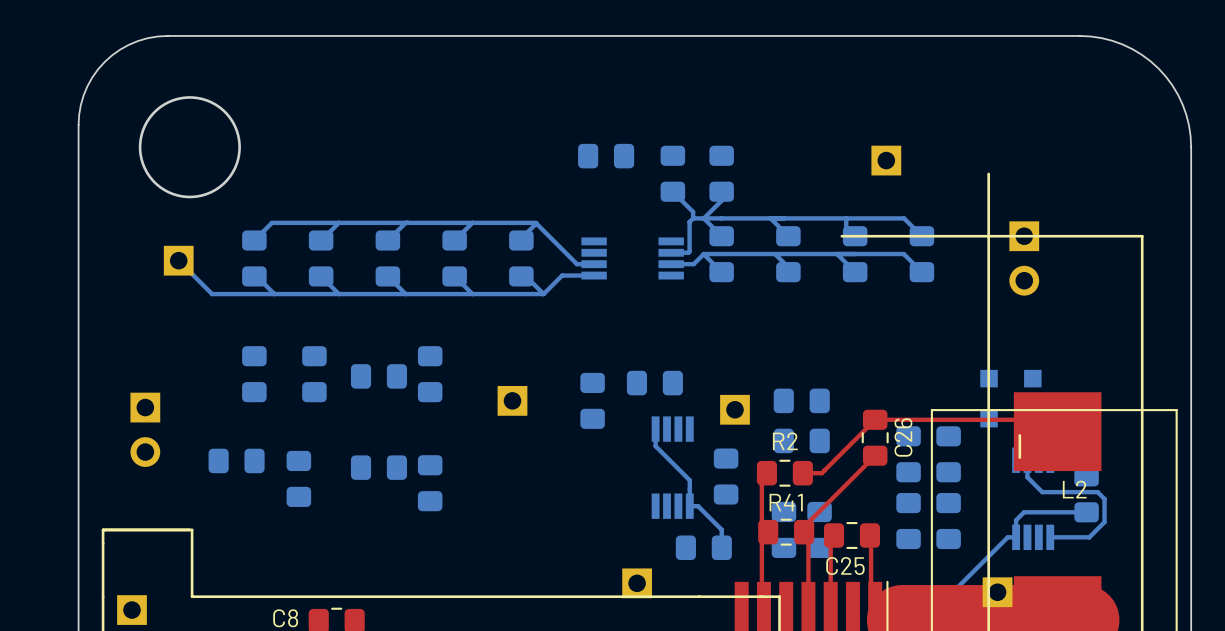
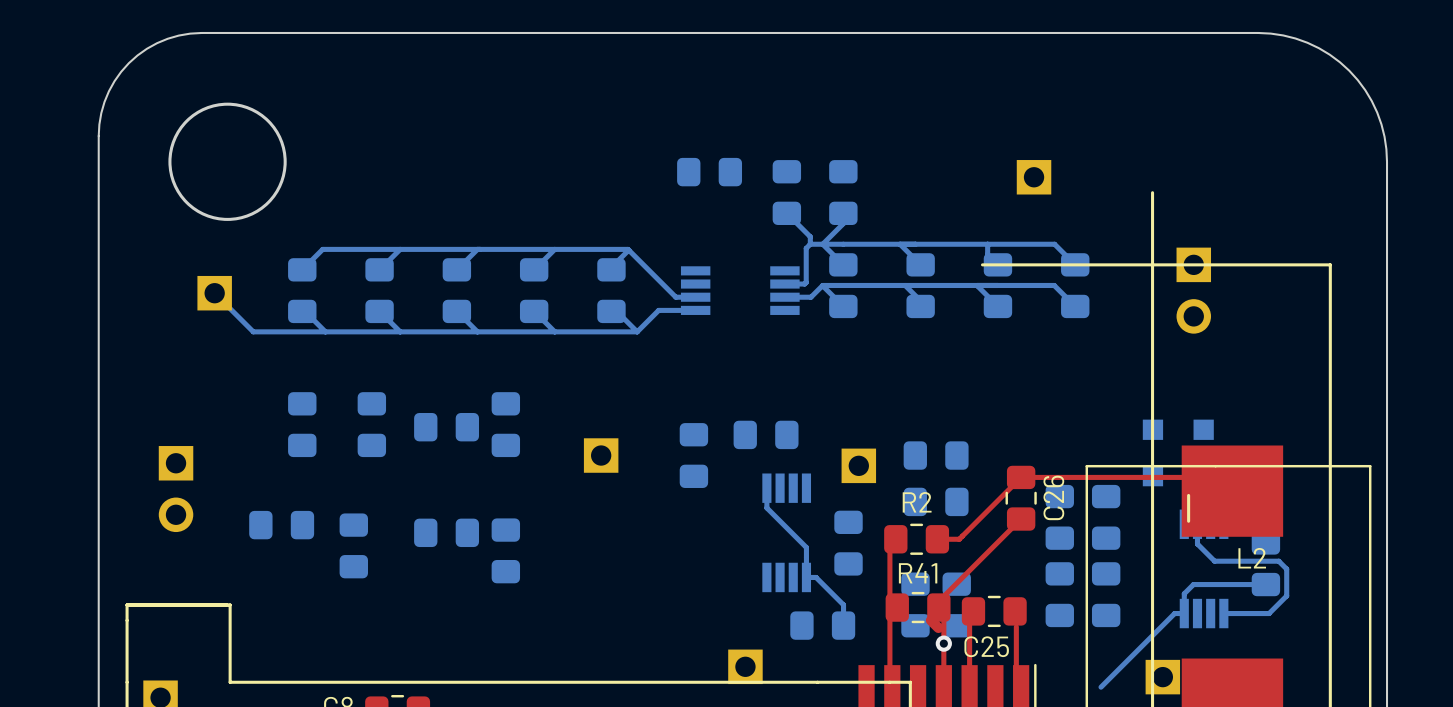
top track: none -> (938, 612) (930, 620) (938, 627)
via: none -> (943, 643)

